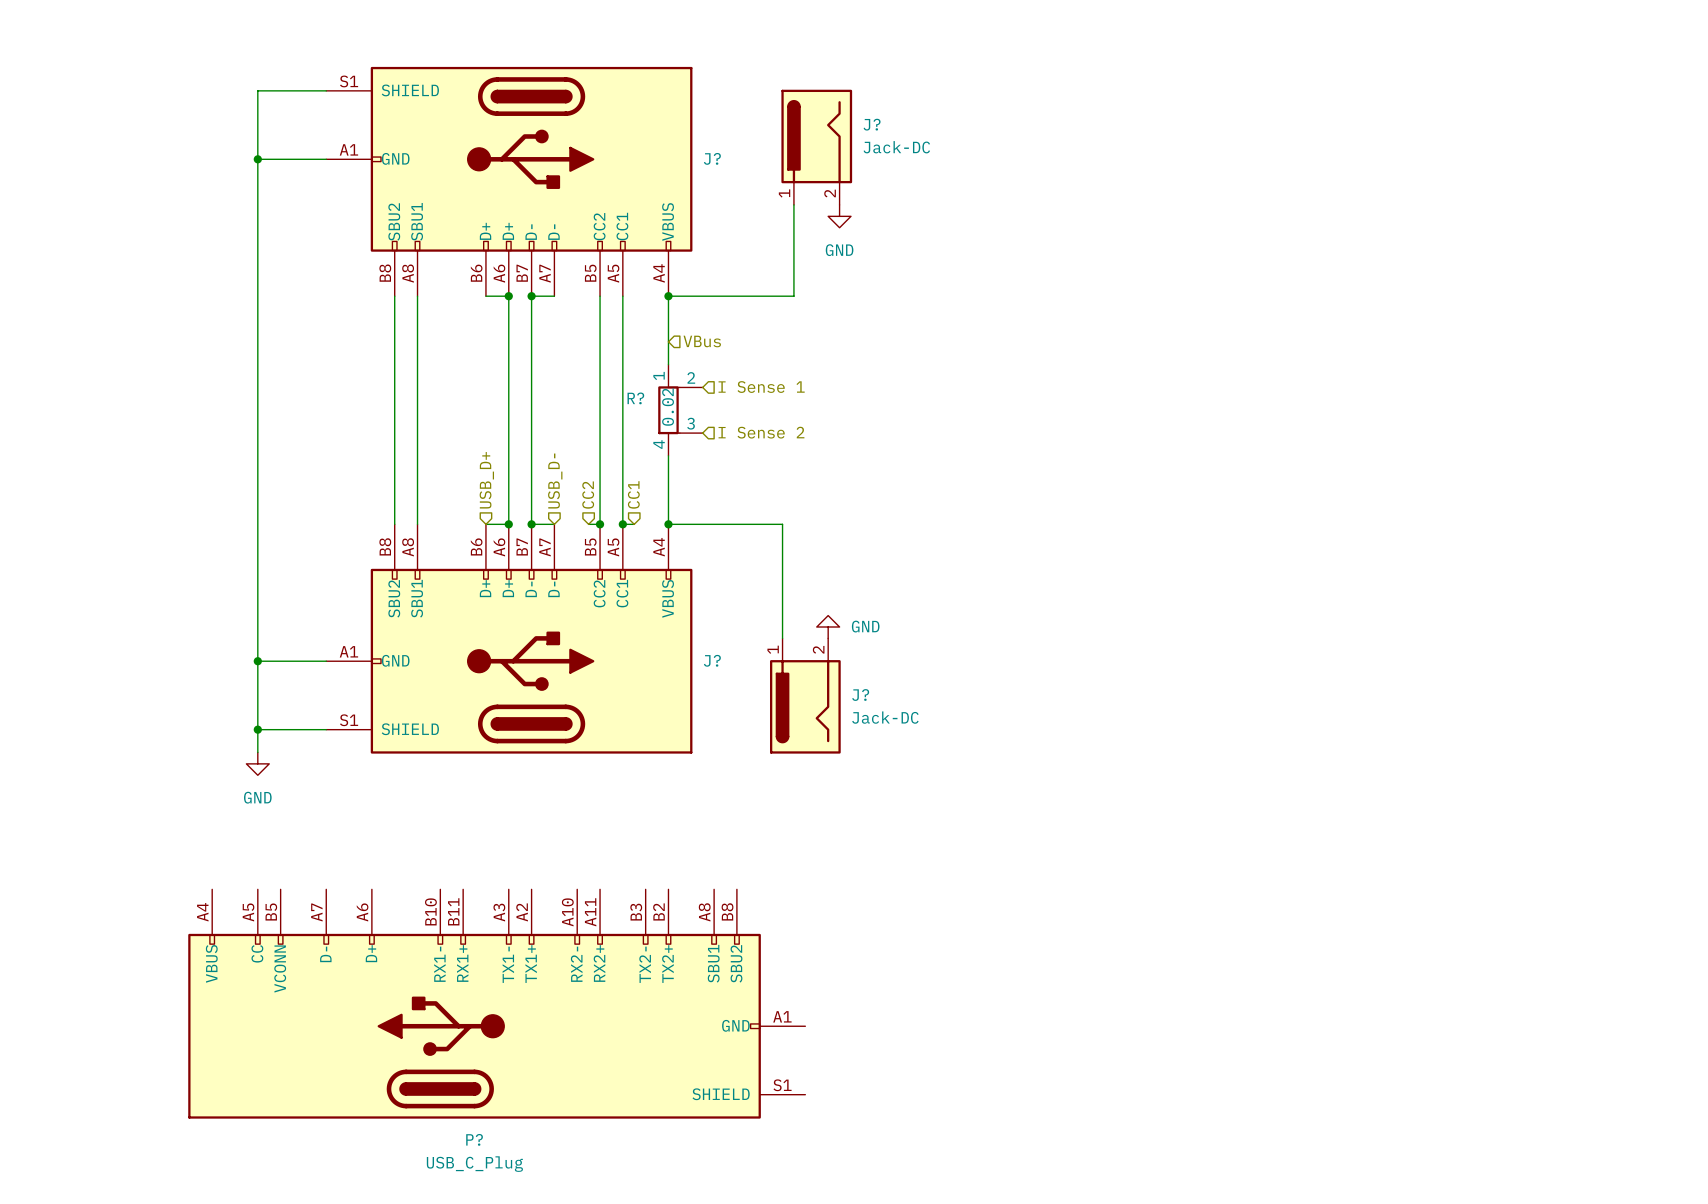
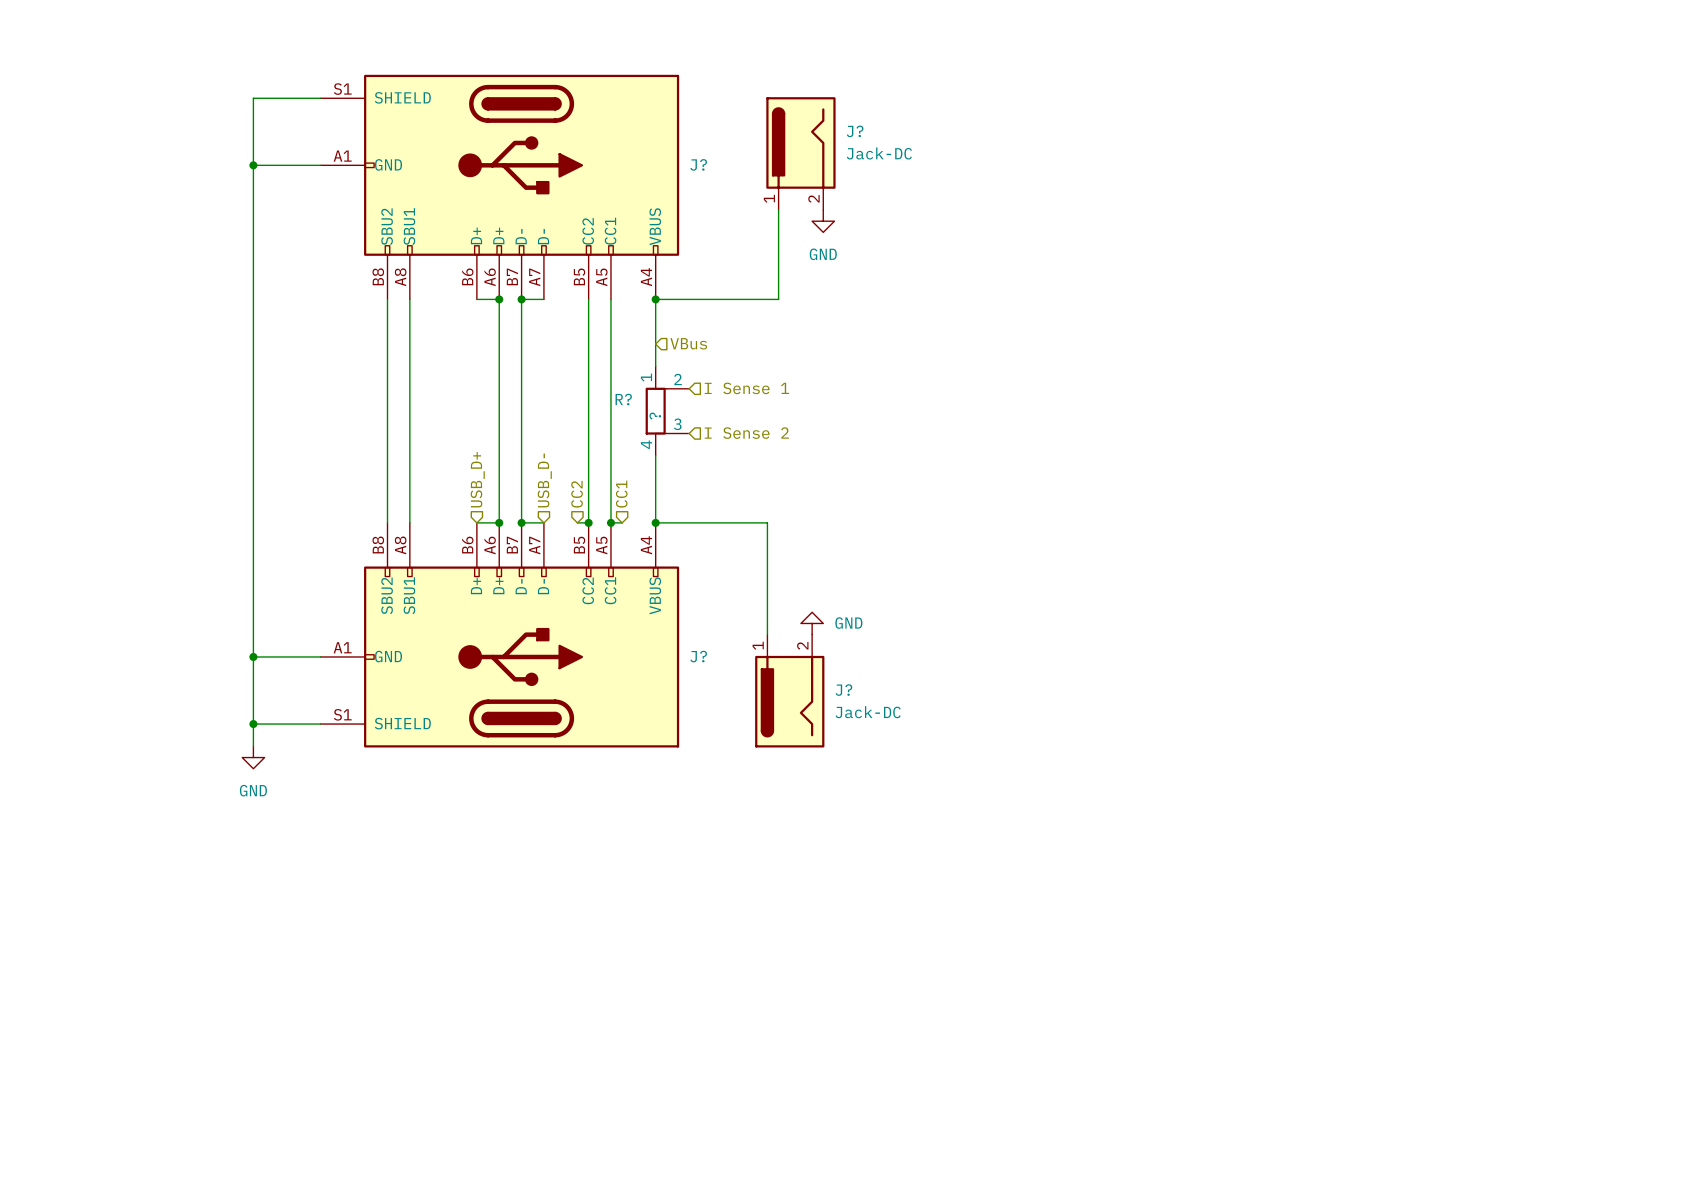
R? value: 0.02 (668, 407) -> ? (655, 416)
P?: USB_C_Plug (496, 1004) -> none

